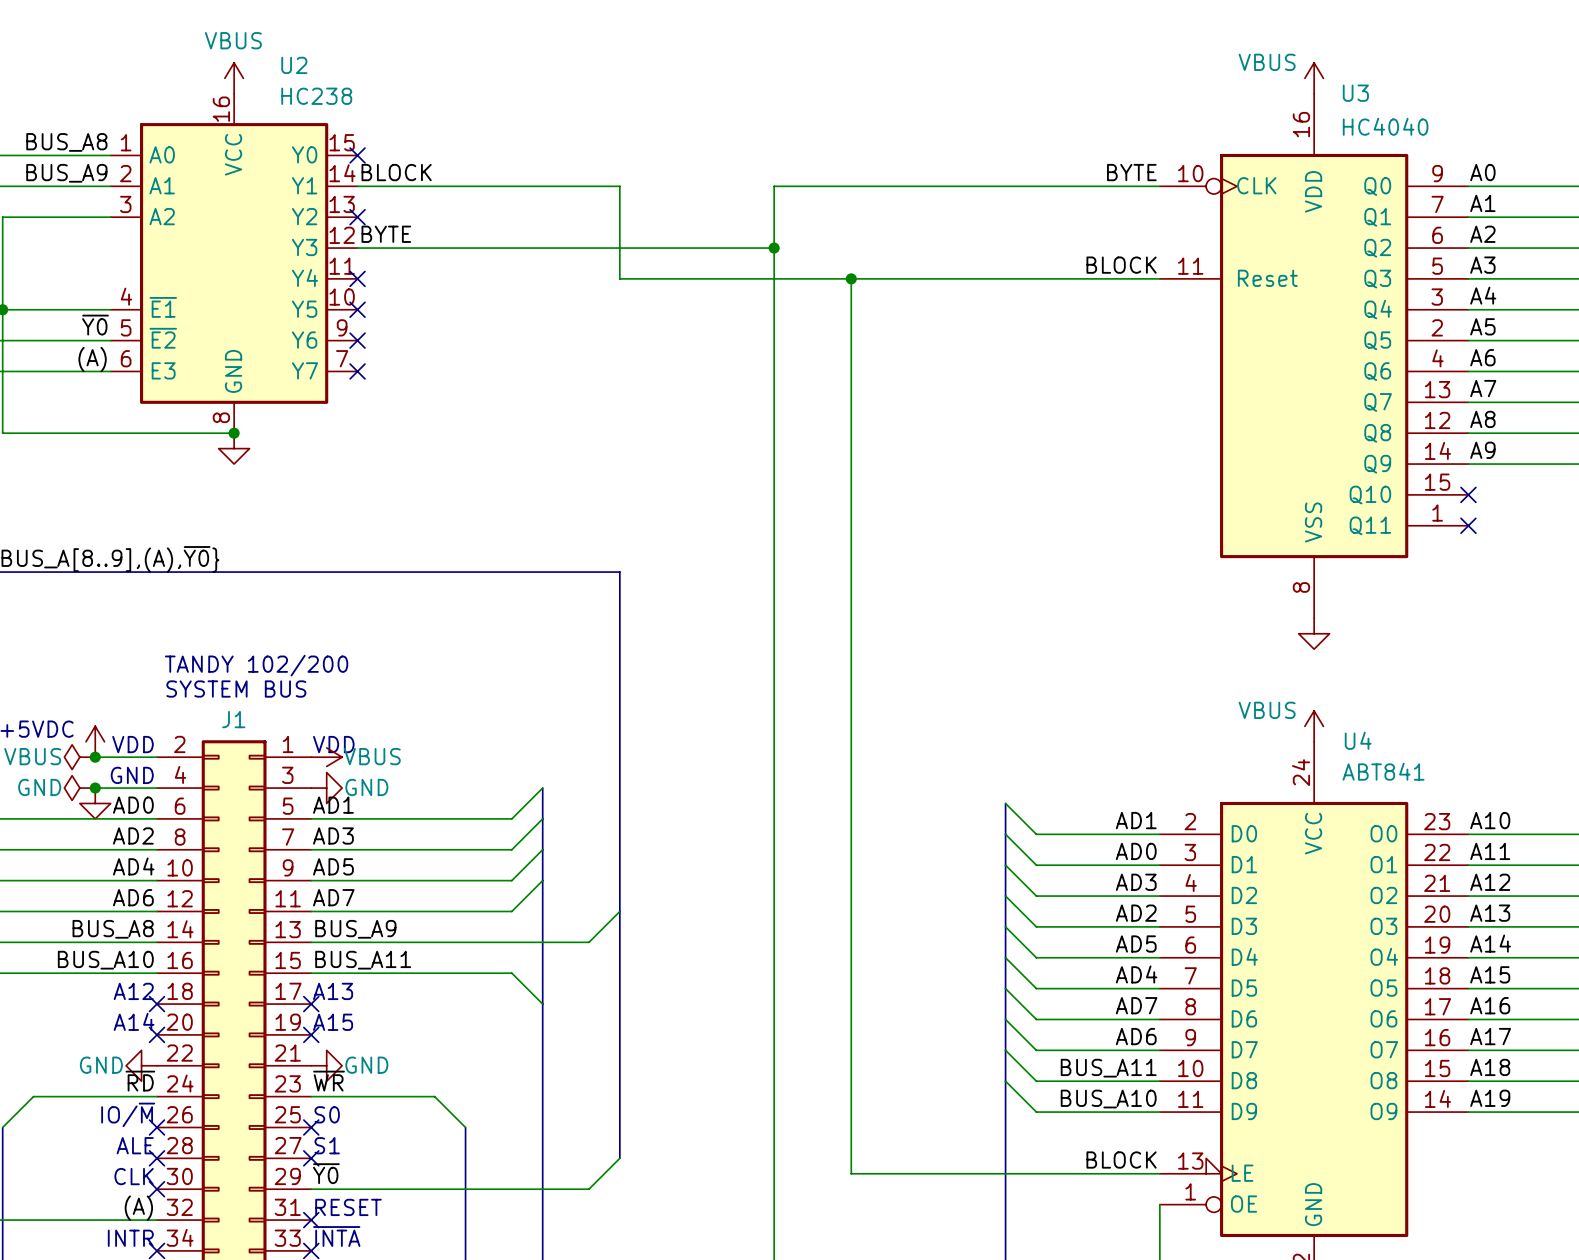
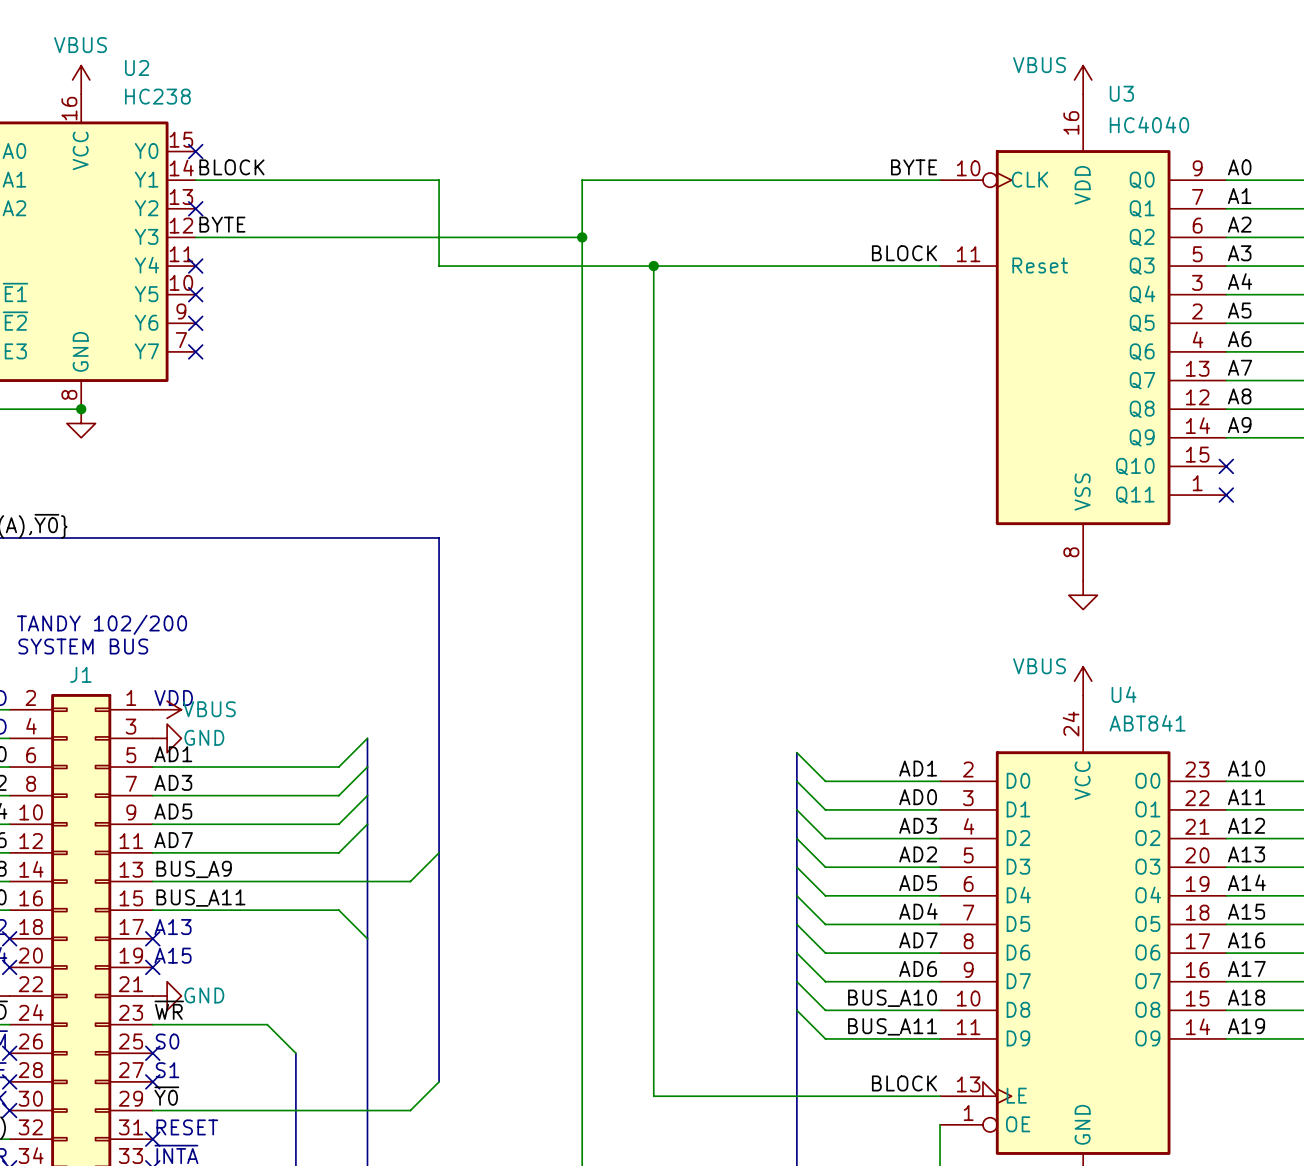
label: BUS_A11 (1108, 1068) -> BUS_A10 (892, 998)
label: BUS_A10 (1108, 1099) -> BUS_A11 (892, 1026)

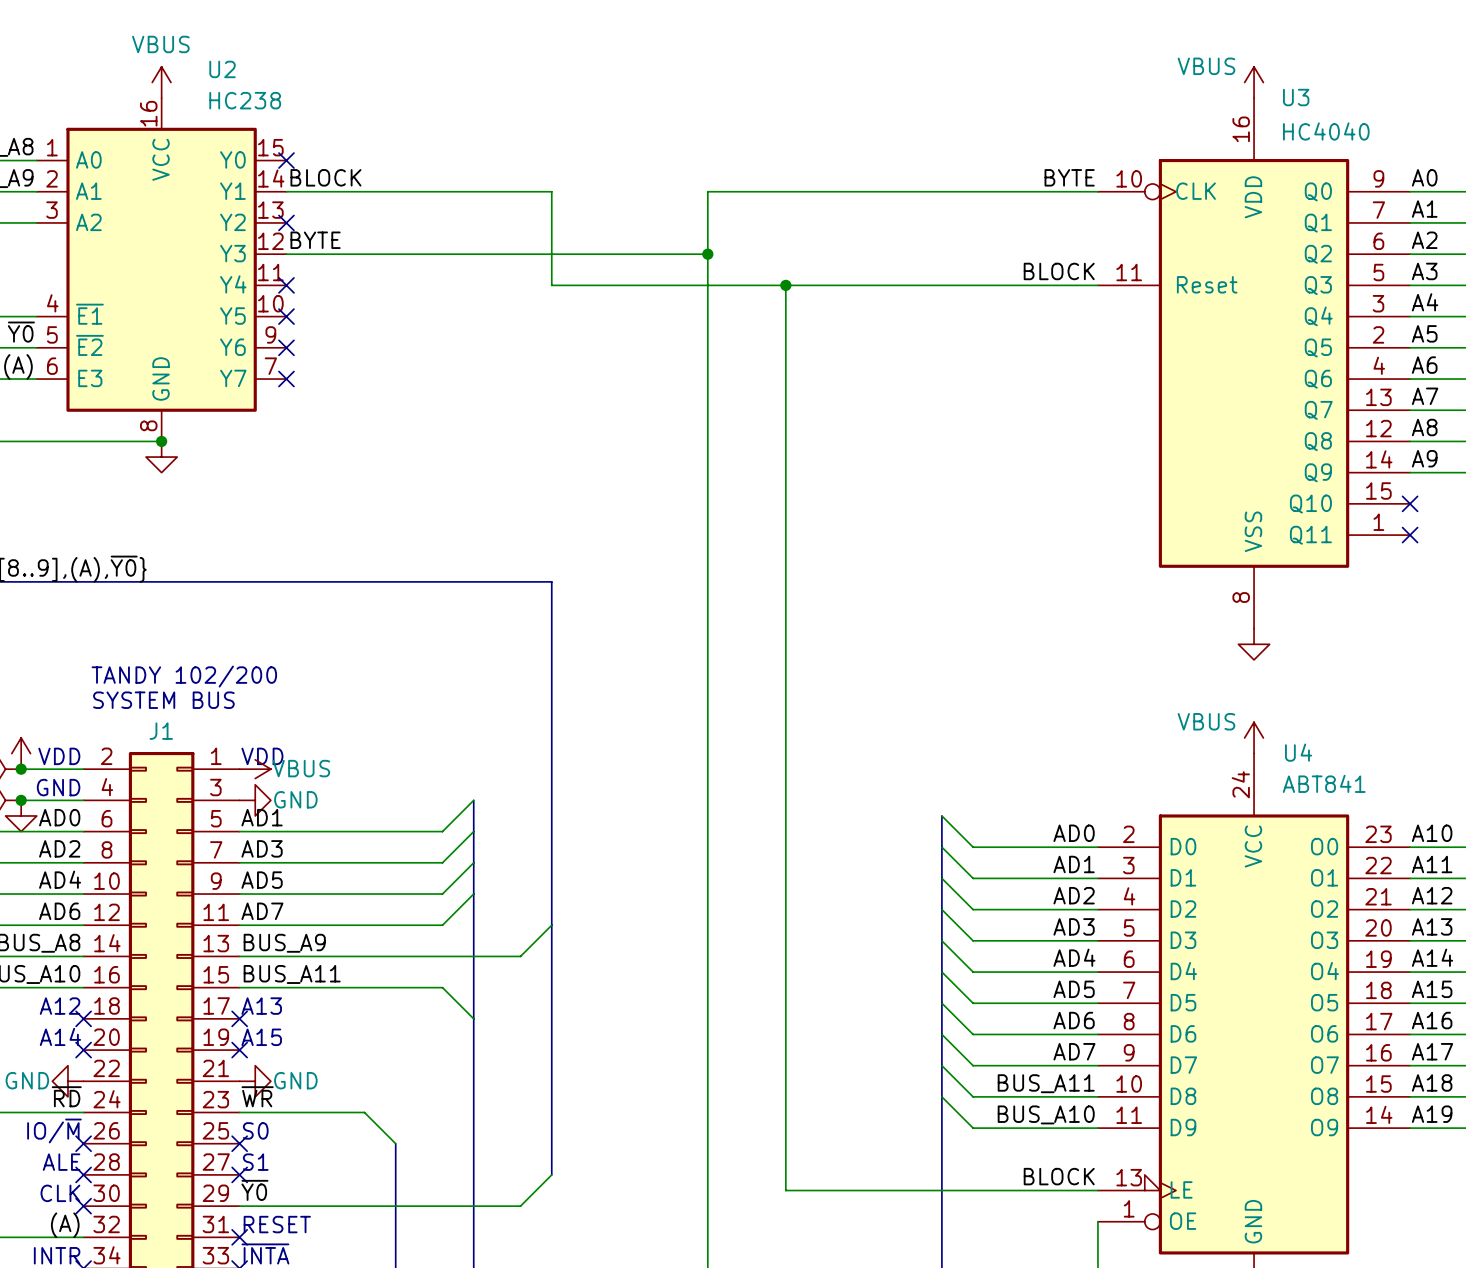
label: AD1 (918, 768) -> AD0 (1074, 833)
label: AD0 (918, 797) -> AD1 (1074, 864)
label: AD3 (918, 825) -> AD2 (1074, 895)
label: AD2 (918, 854) -> AD3 (1074, 926)
label: AD5 (918, 883) -> AD4 (1074, 957)
label: AD4 (918, 911) -> AD5 (1074, 989)
label: AD7 (918, 940) -> AD6 (1074, 1020)
label: AD6 (918, 968) -> AD7 (1074, 1051)
label: BUS_A10 (892, 998) -> BUS_A11 (1046, 1083)
label: BUS_A11 (892, 1026) -> BUS_A10 (1046, 1114)

